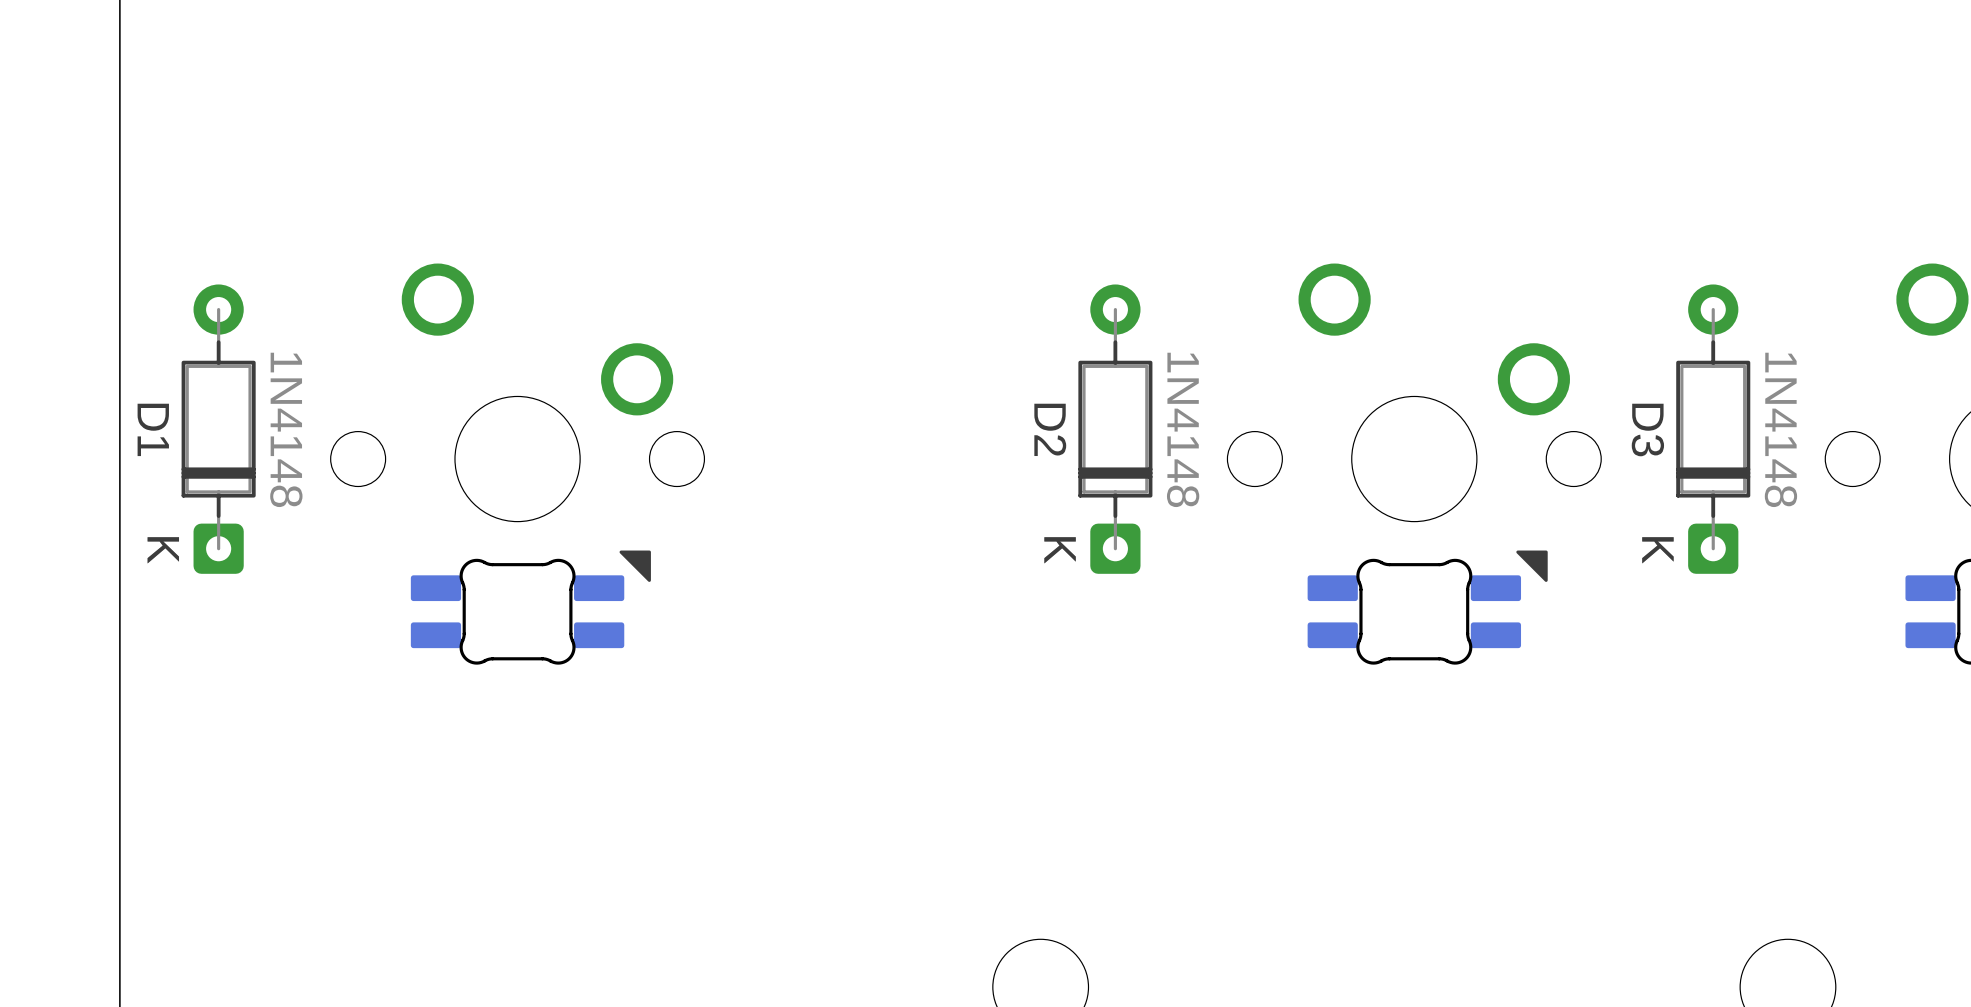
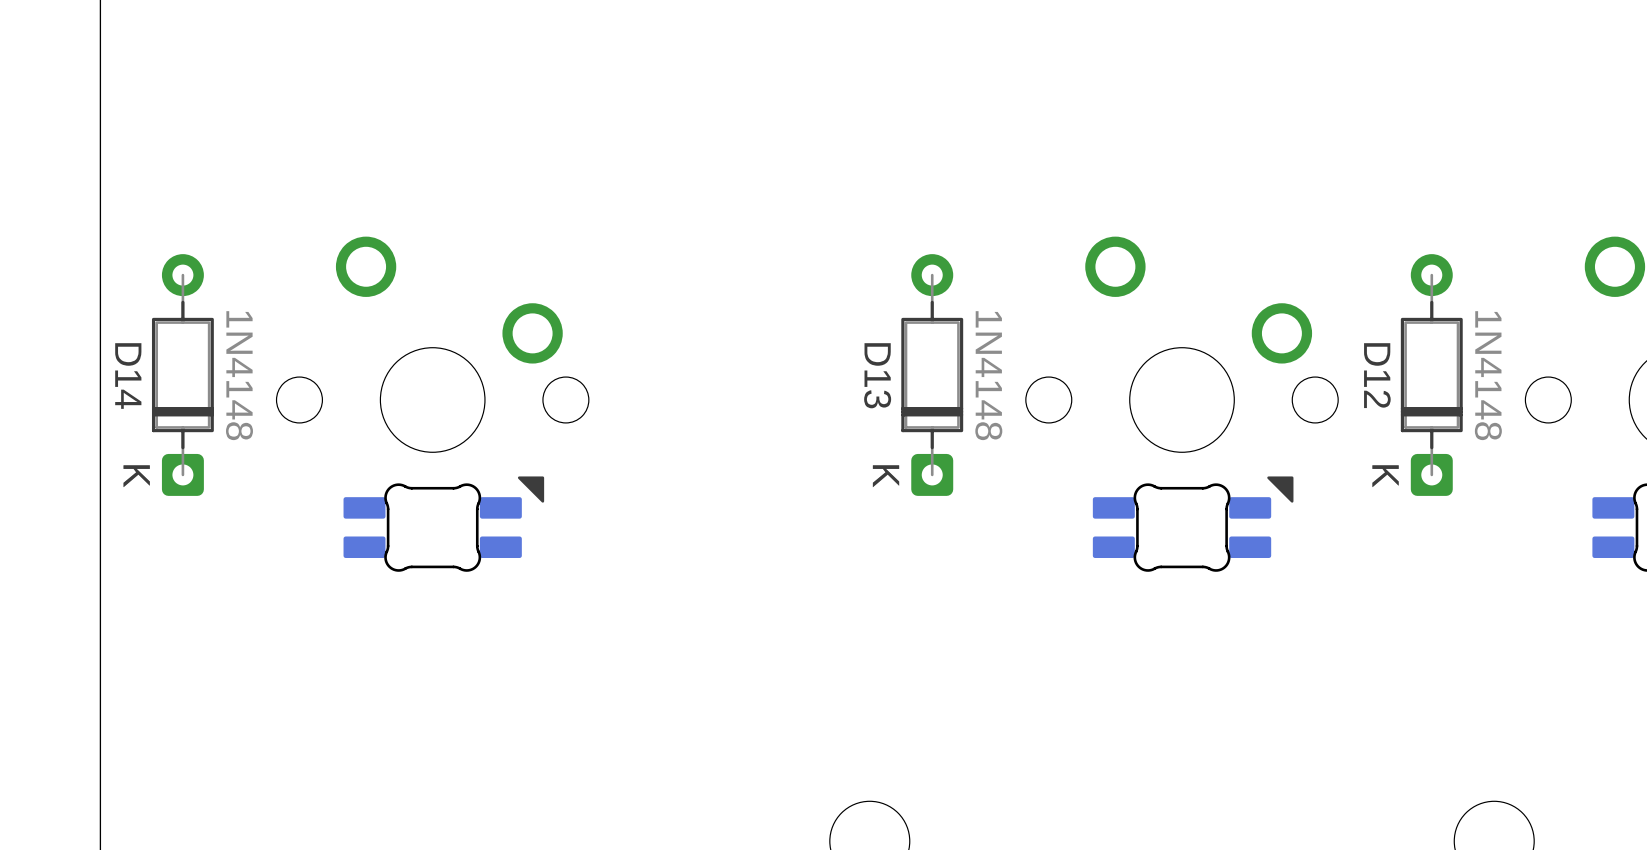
D1 name: D1 (153, 429) -> D14 (128, 376)
D2 name: D2 (1050, 429) -> D13 (877, 375)
D3 name: D3 (1647, 430) -> D12 (1377, 375)

